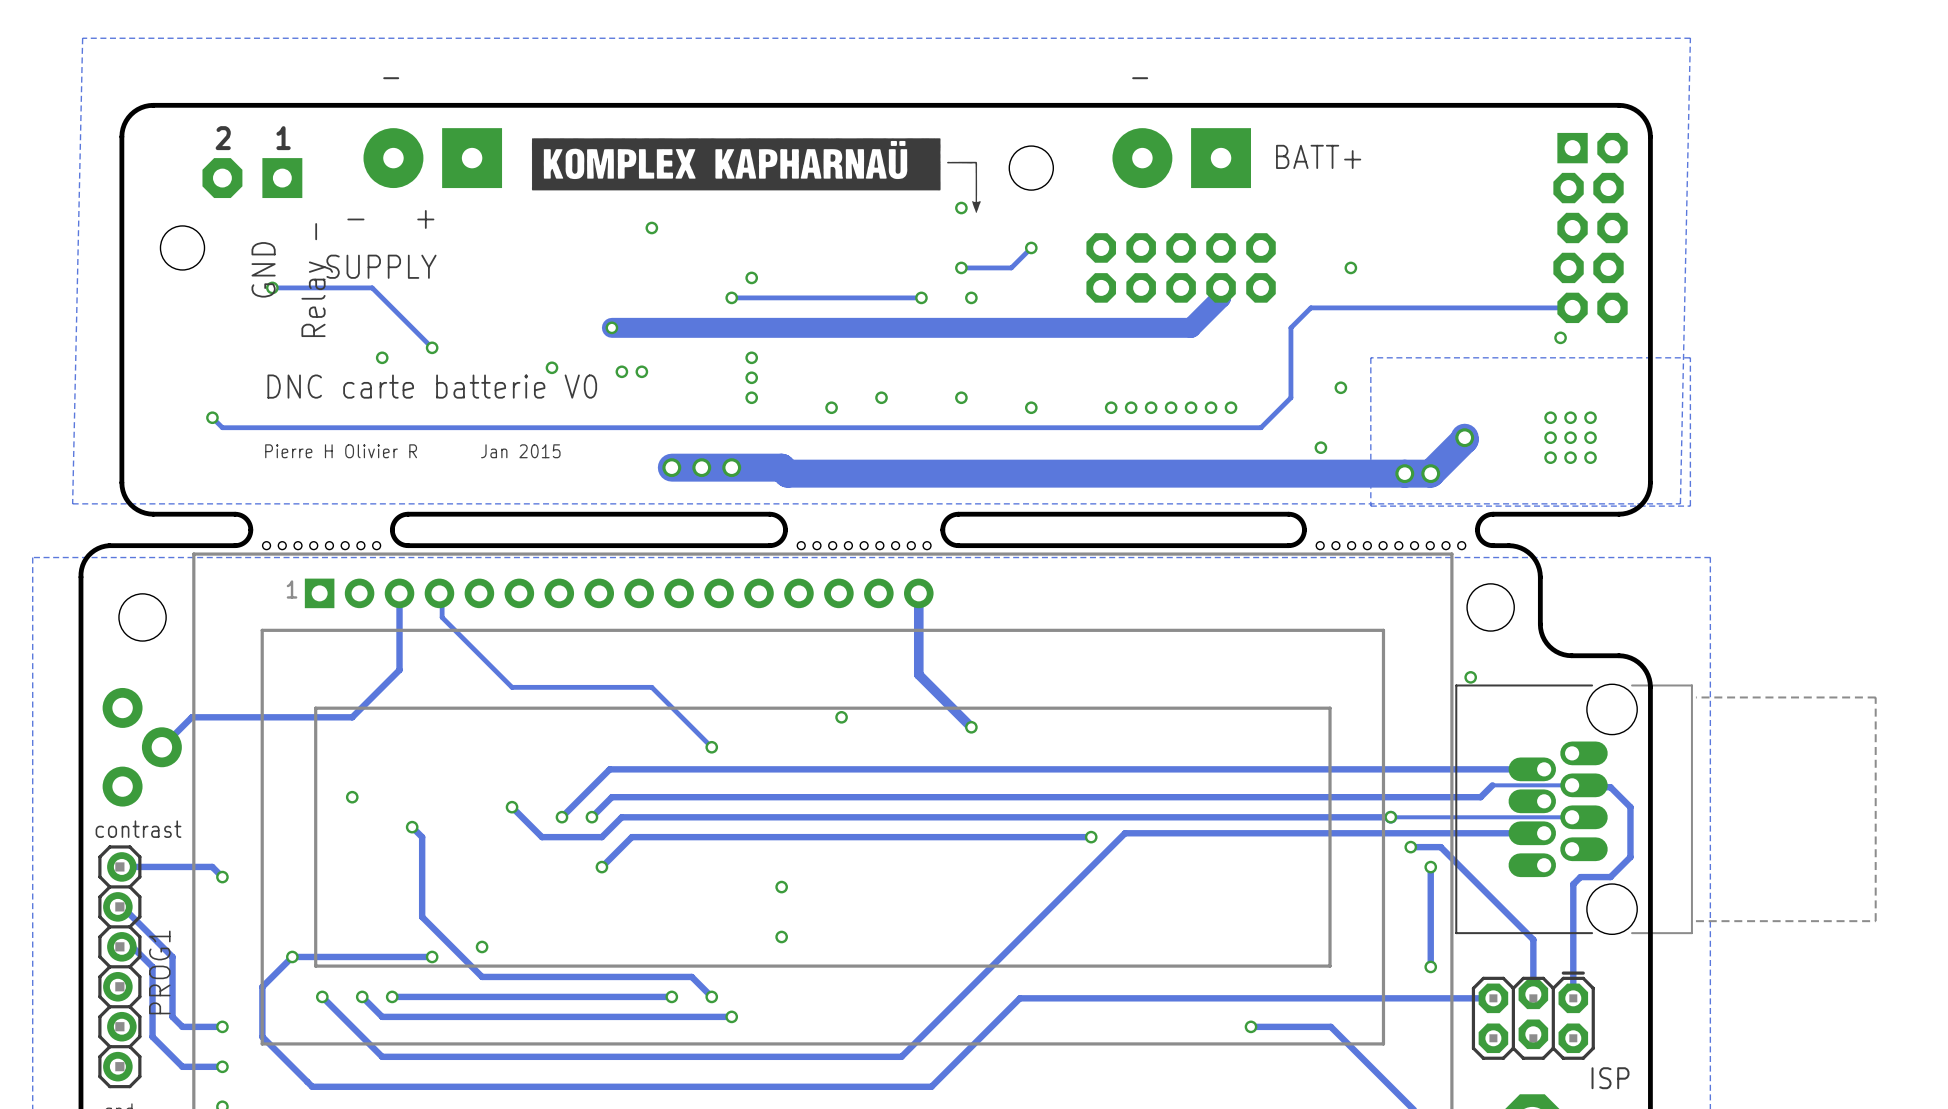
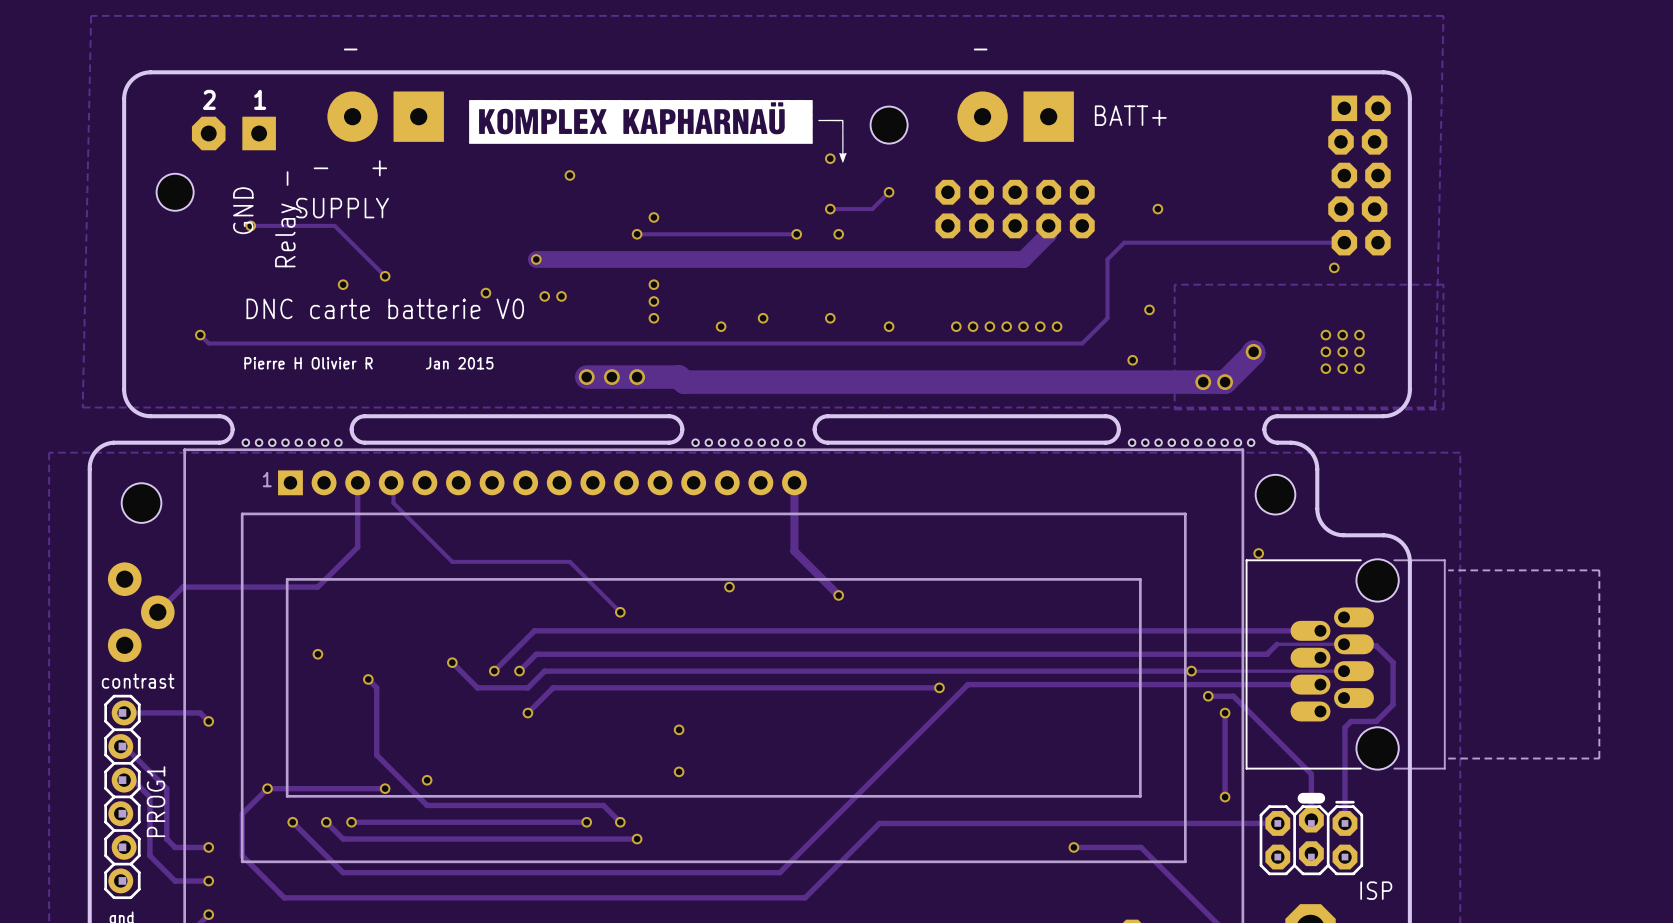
ISP footprint: [1471, 971, 1595, 1060] -> [1259, 792, 1364, 876]

